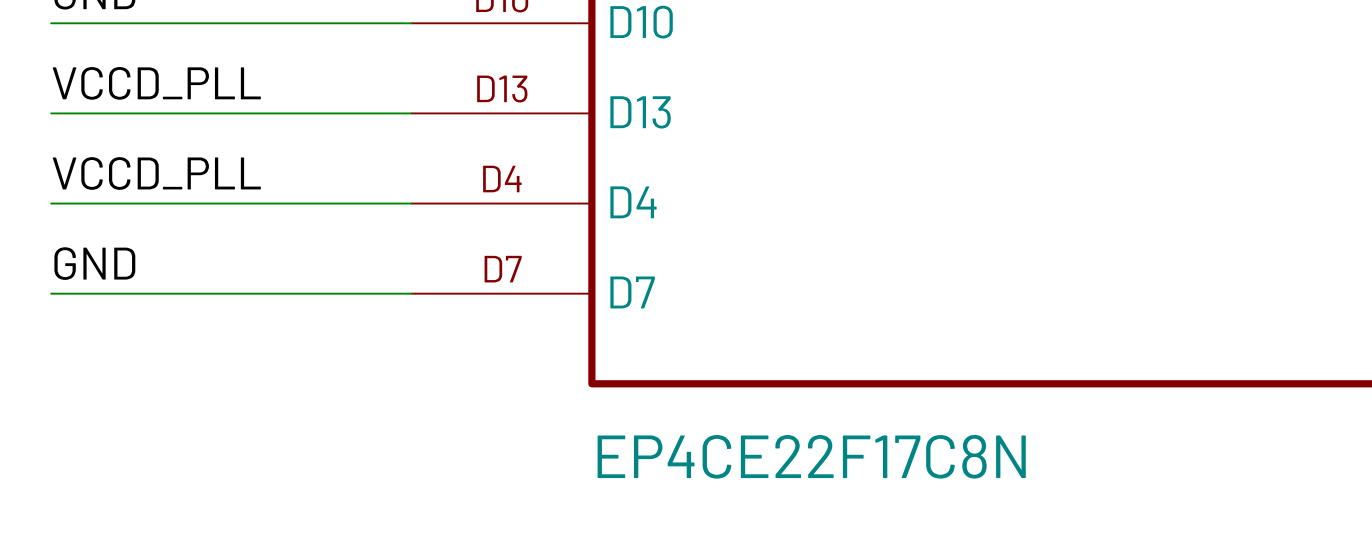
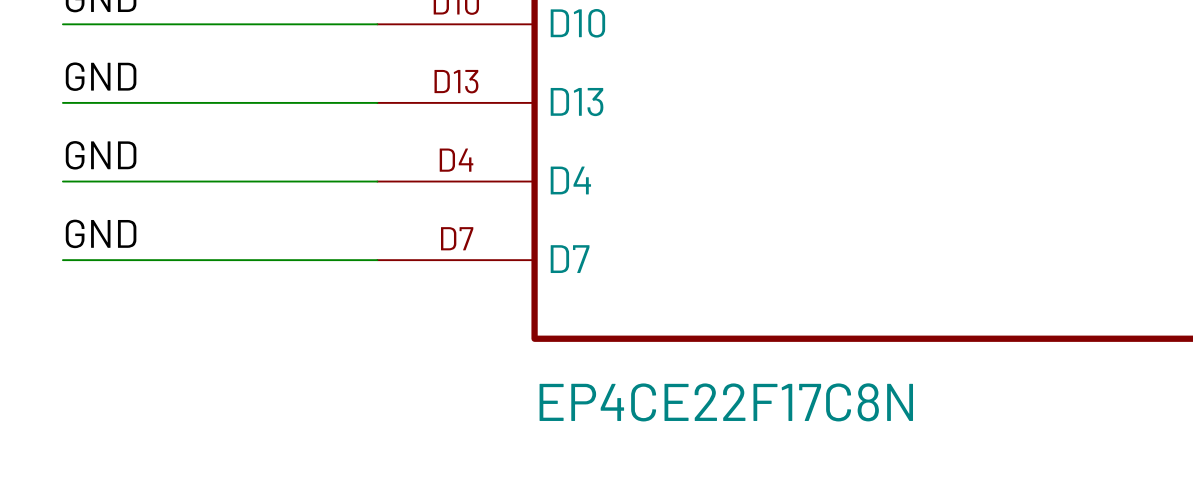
label: VCCD_PLL (156, 83) -> GND (101, 76)
label: VCCD_PLL (156, 173) -> GND (101, 155)

